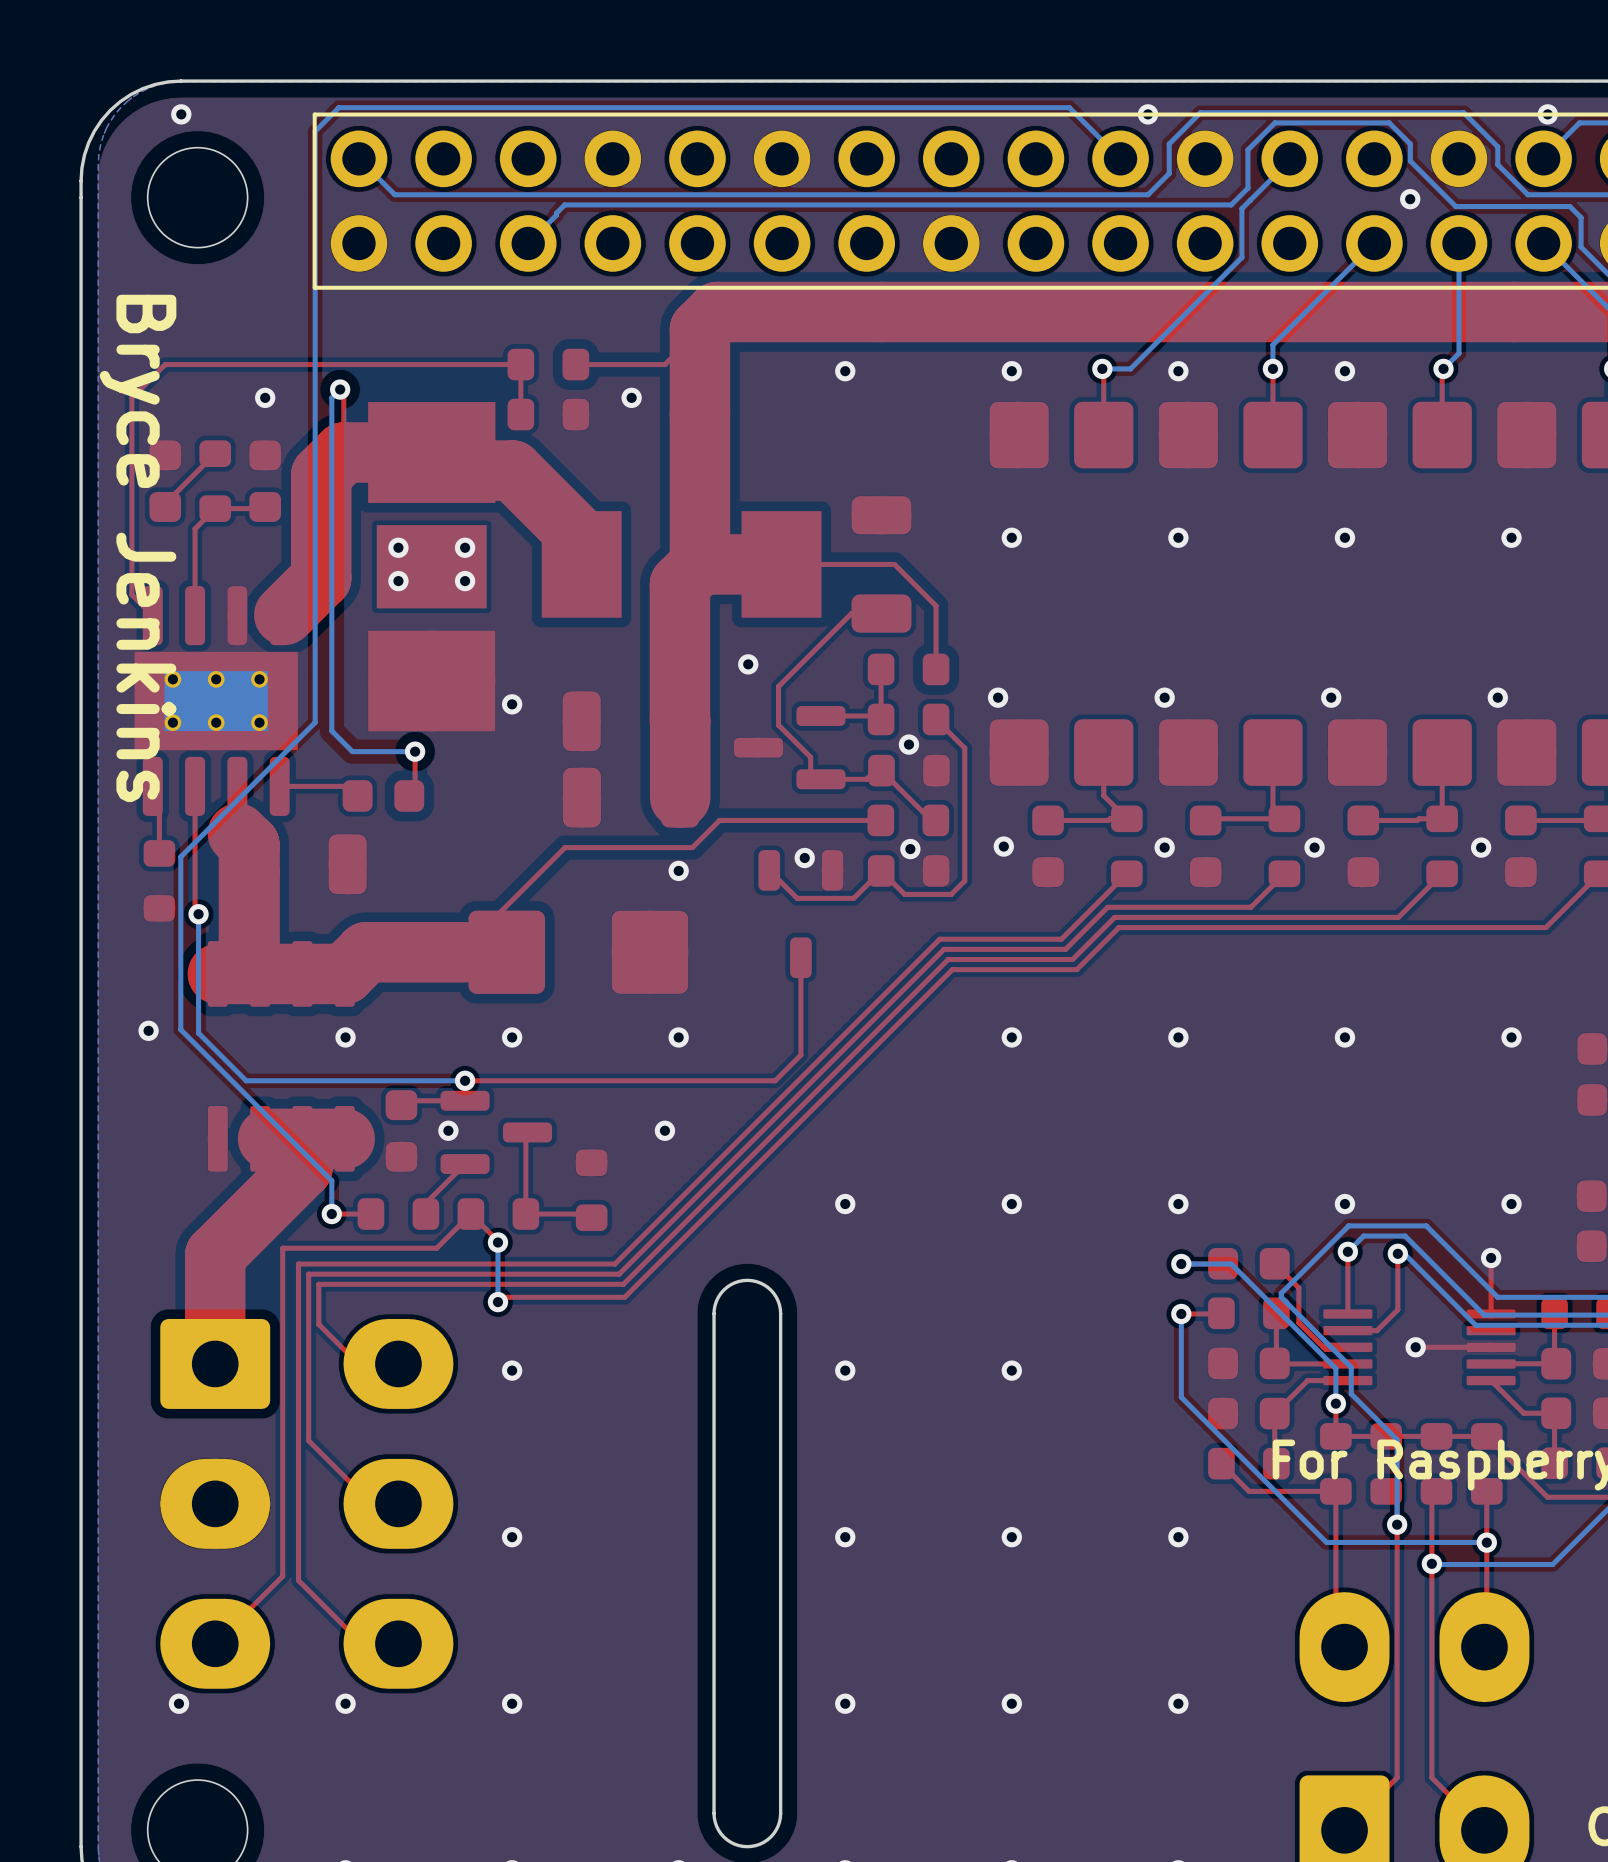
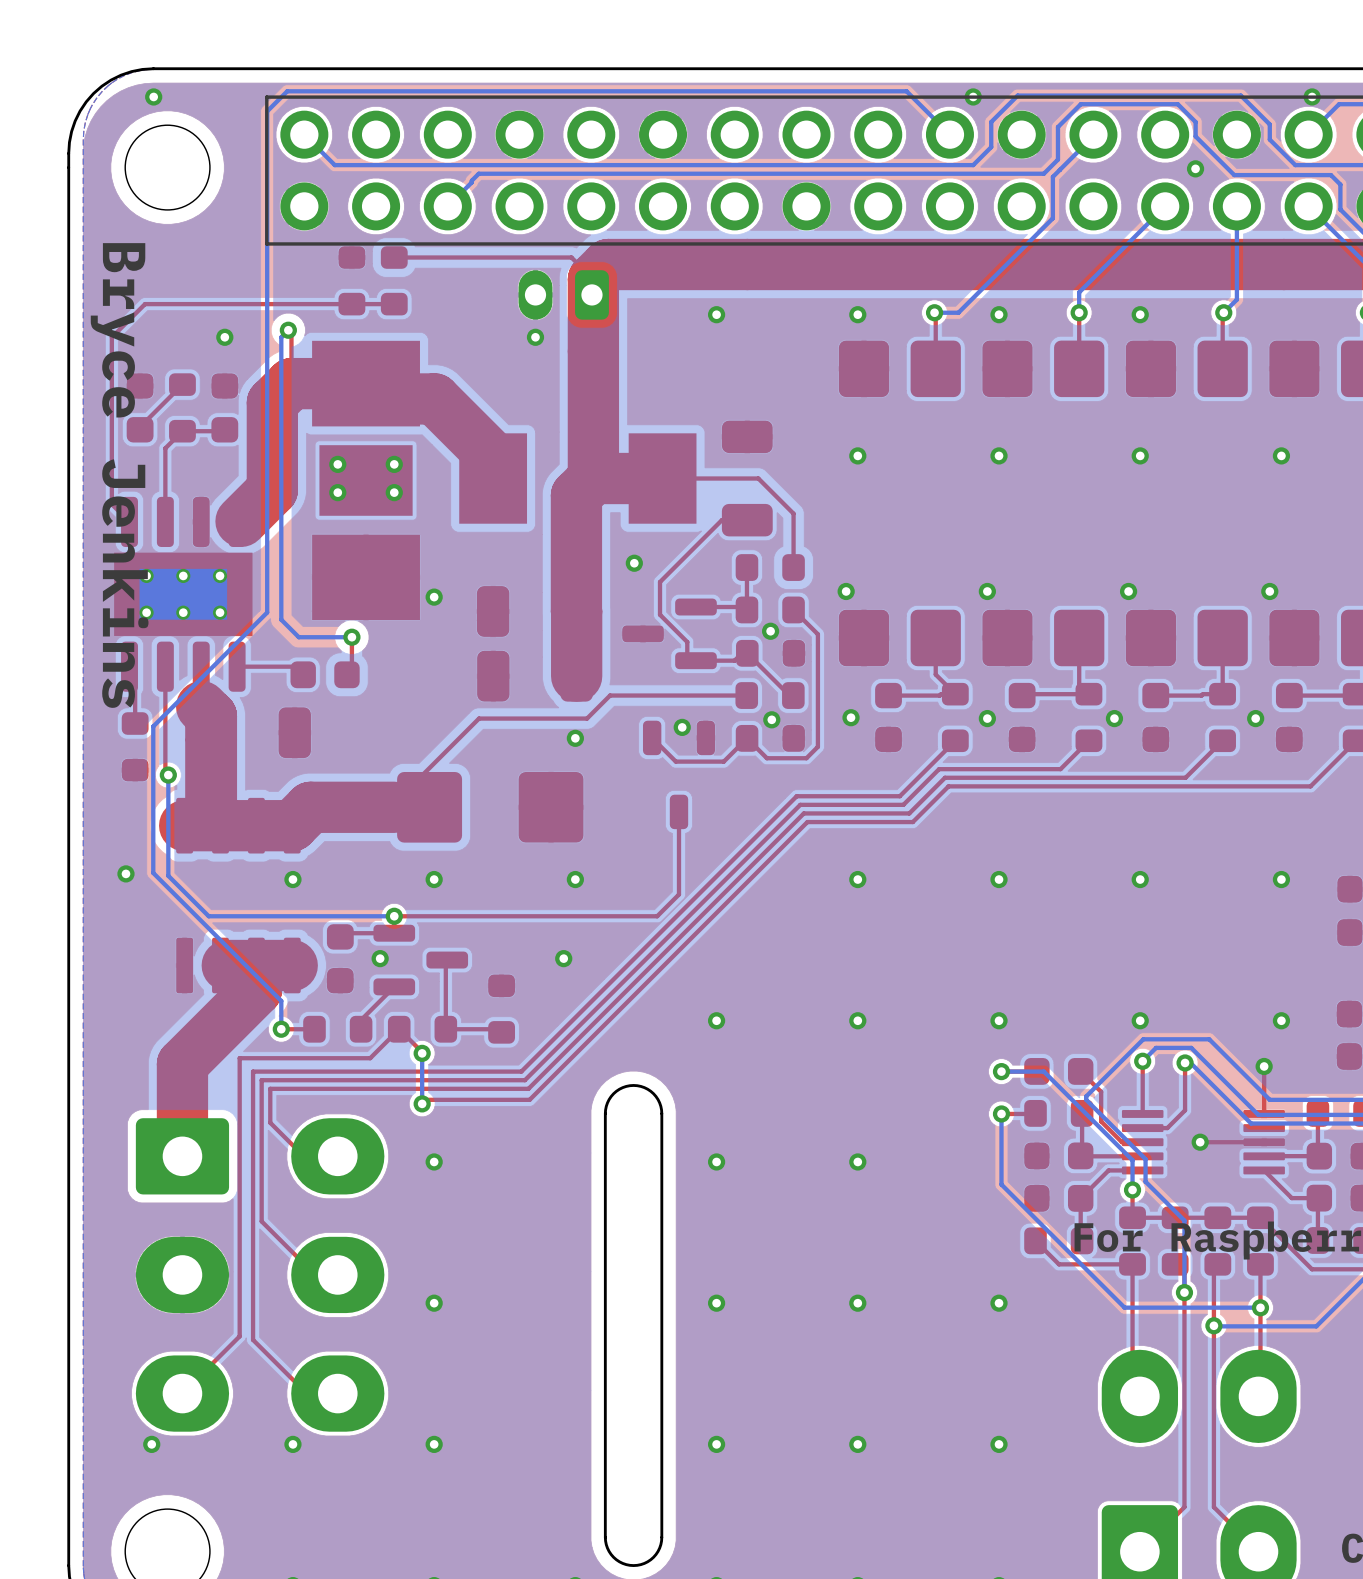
top track: (699, 329) (664, 364) (575, 364) -> (593, 279) (571, 257) (394, 257)
part: none -> (351, 280)
part: none -> (394, 280)
part: none -> (563, 294)
top track: (165, 364) (520, 364) (520, 414) -> (140, 309) (145, 304) (394, 304)
part: (548, 364) -> none
part: (548, 414) -> none

